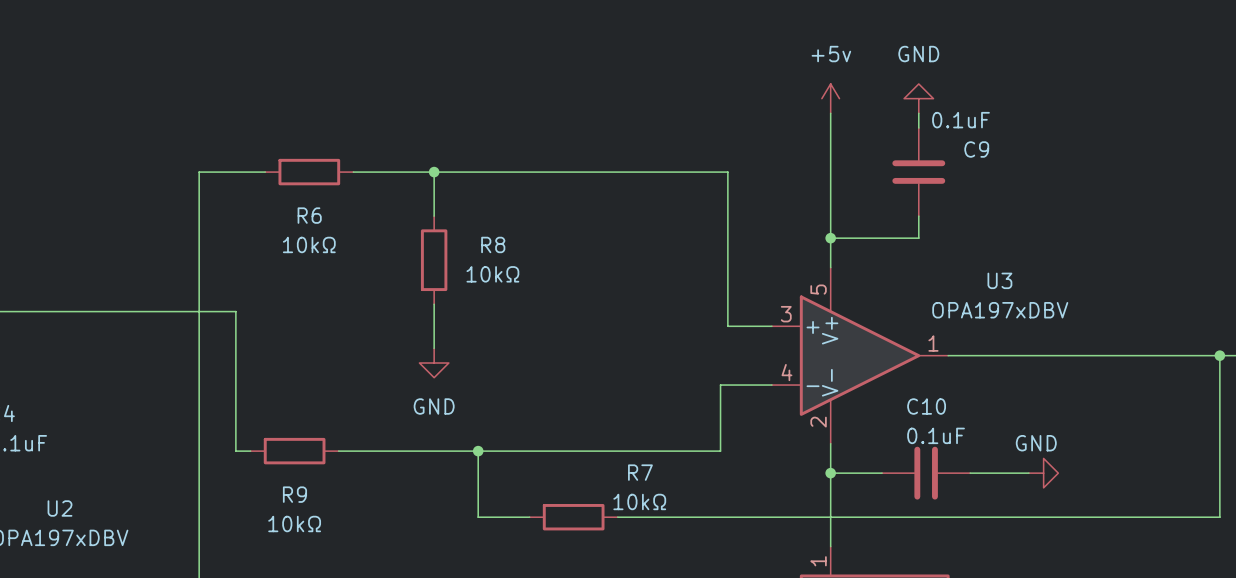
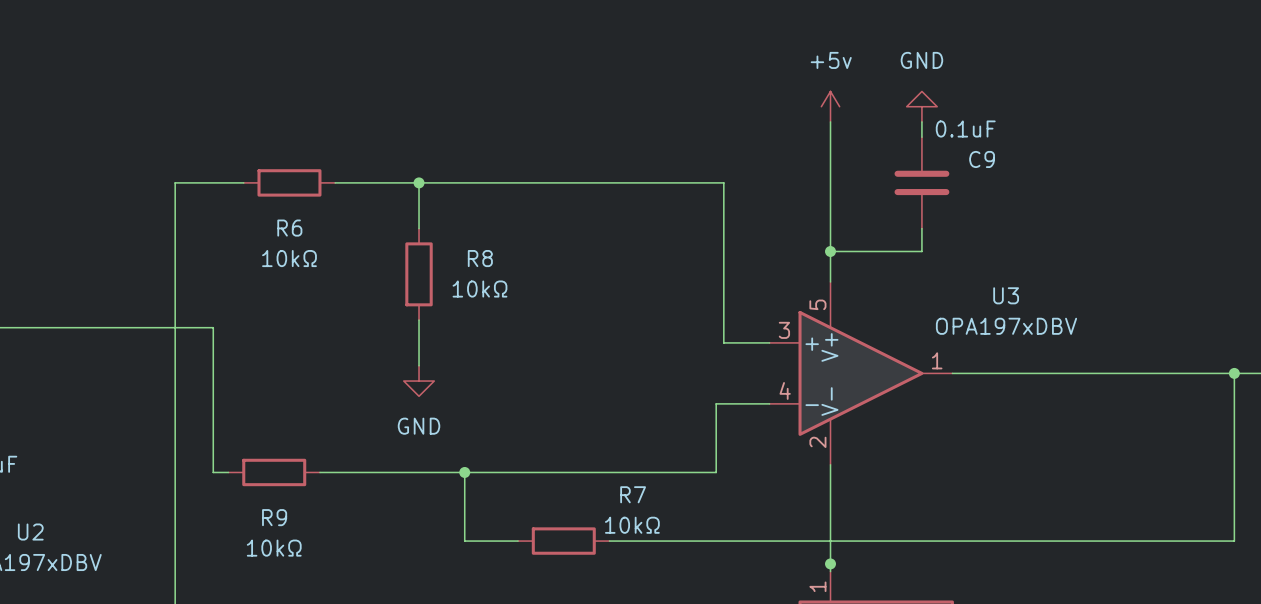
wire: (830, 473) (882, 473) -> none
junction position: (830, 473) -> (830, 563)
C10: 0.1uF (926, 473) -> none
wire: (970, 473) (1028, 473) -> none
power symbol: GND (1043, 473) -> none

